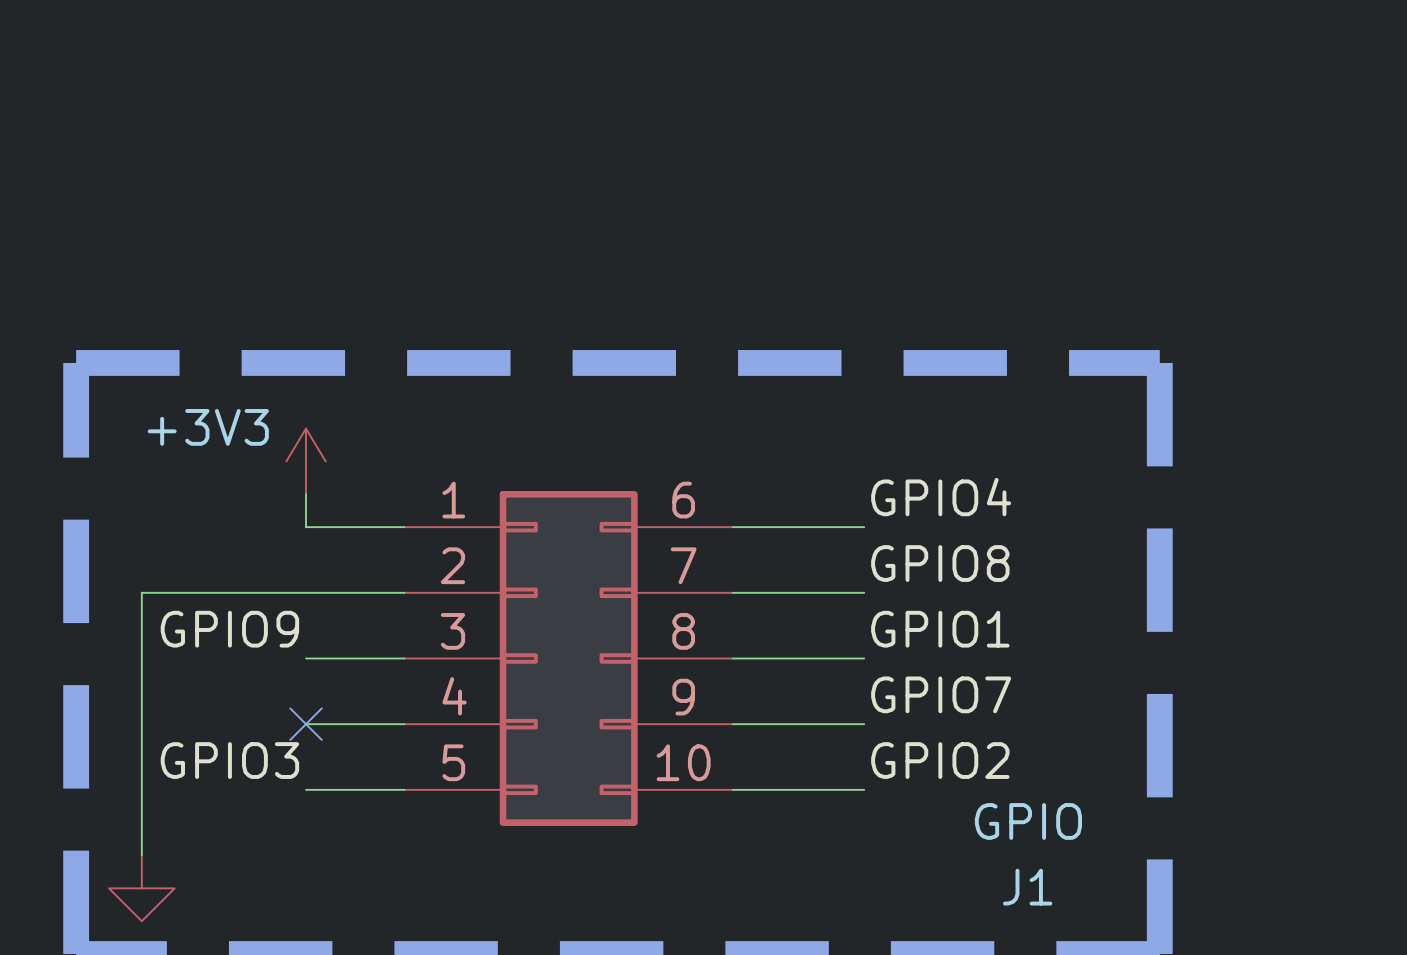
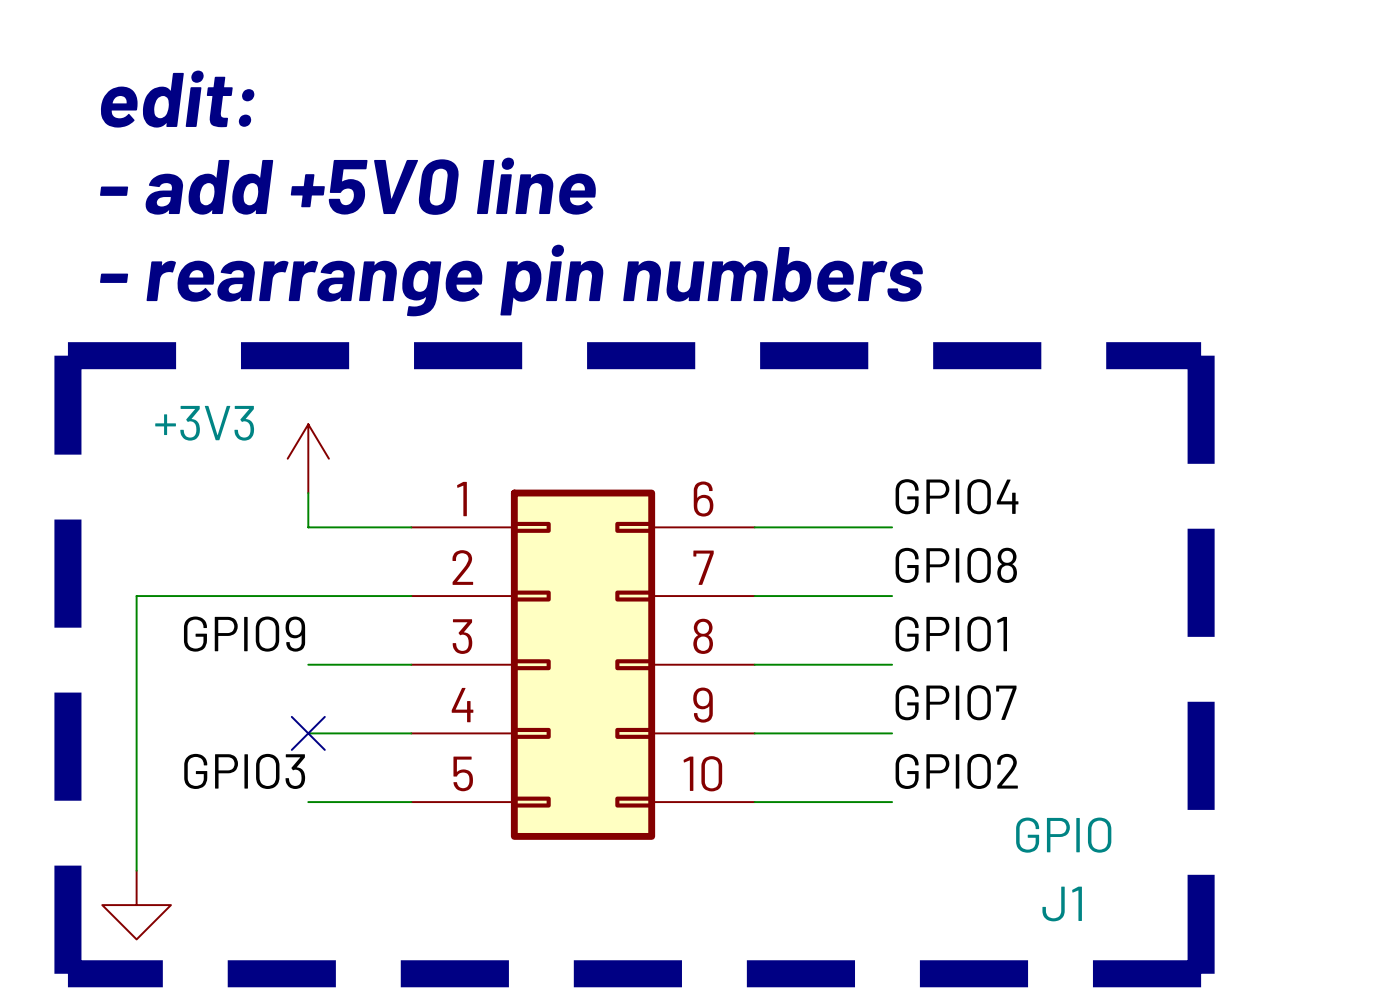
text: none -> edit: (177, 99)
text: none -> - add +5V0 line (347, 186)
text: none -> - rearrange pin numbers (511, 280)

